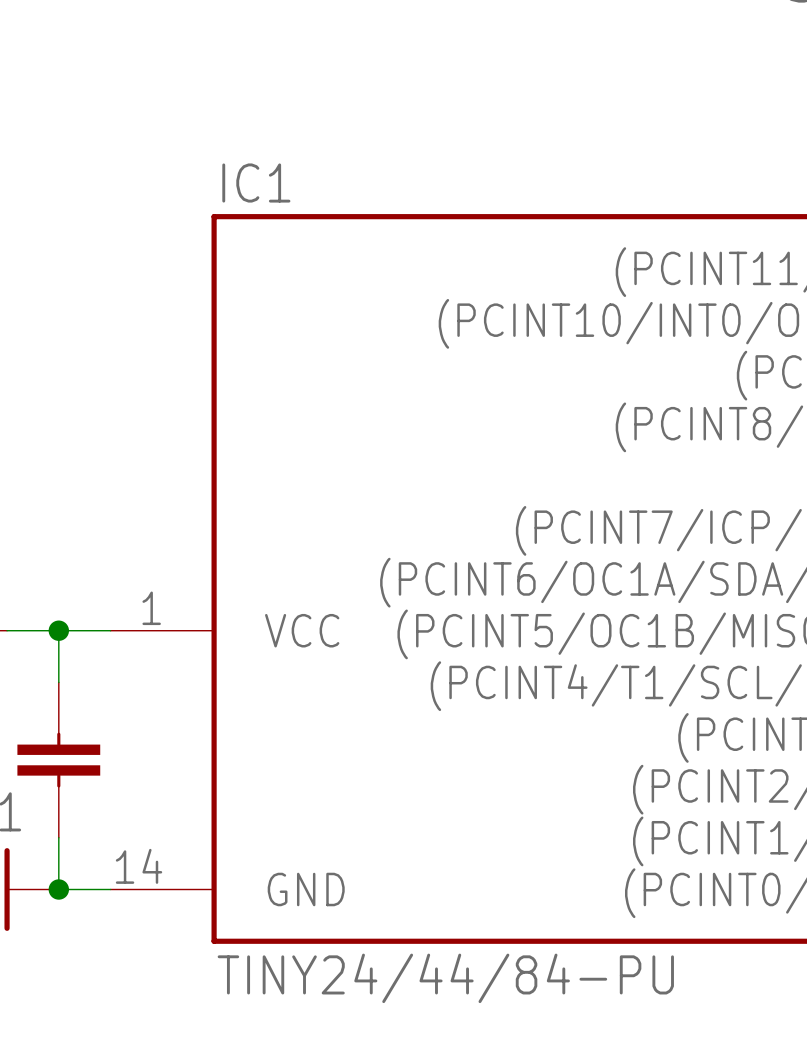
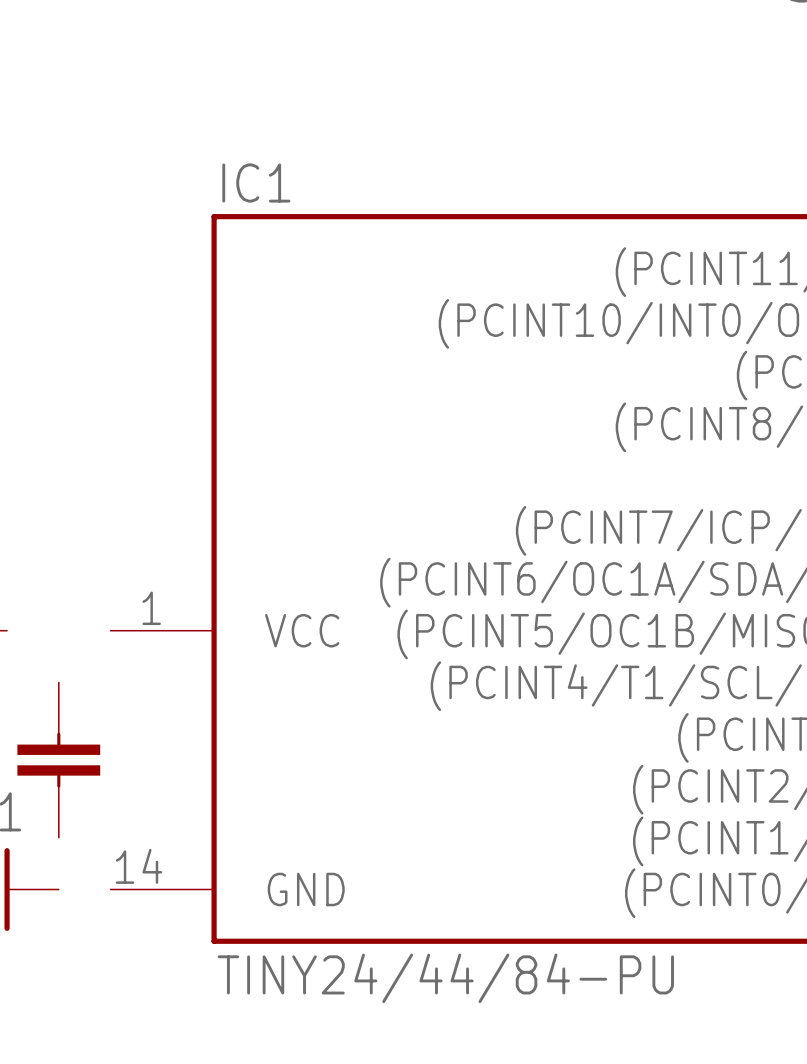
wire: (7, 630) (110, 630) -> none
wire: (58, 630) (58, 682) -> none
junction: (58, 630) -> none
wire: (58, 837) (58, 889) (110, 889) -> none
junction: (58, 889) -> none

